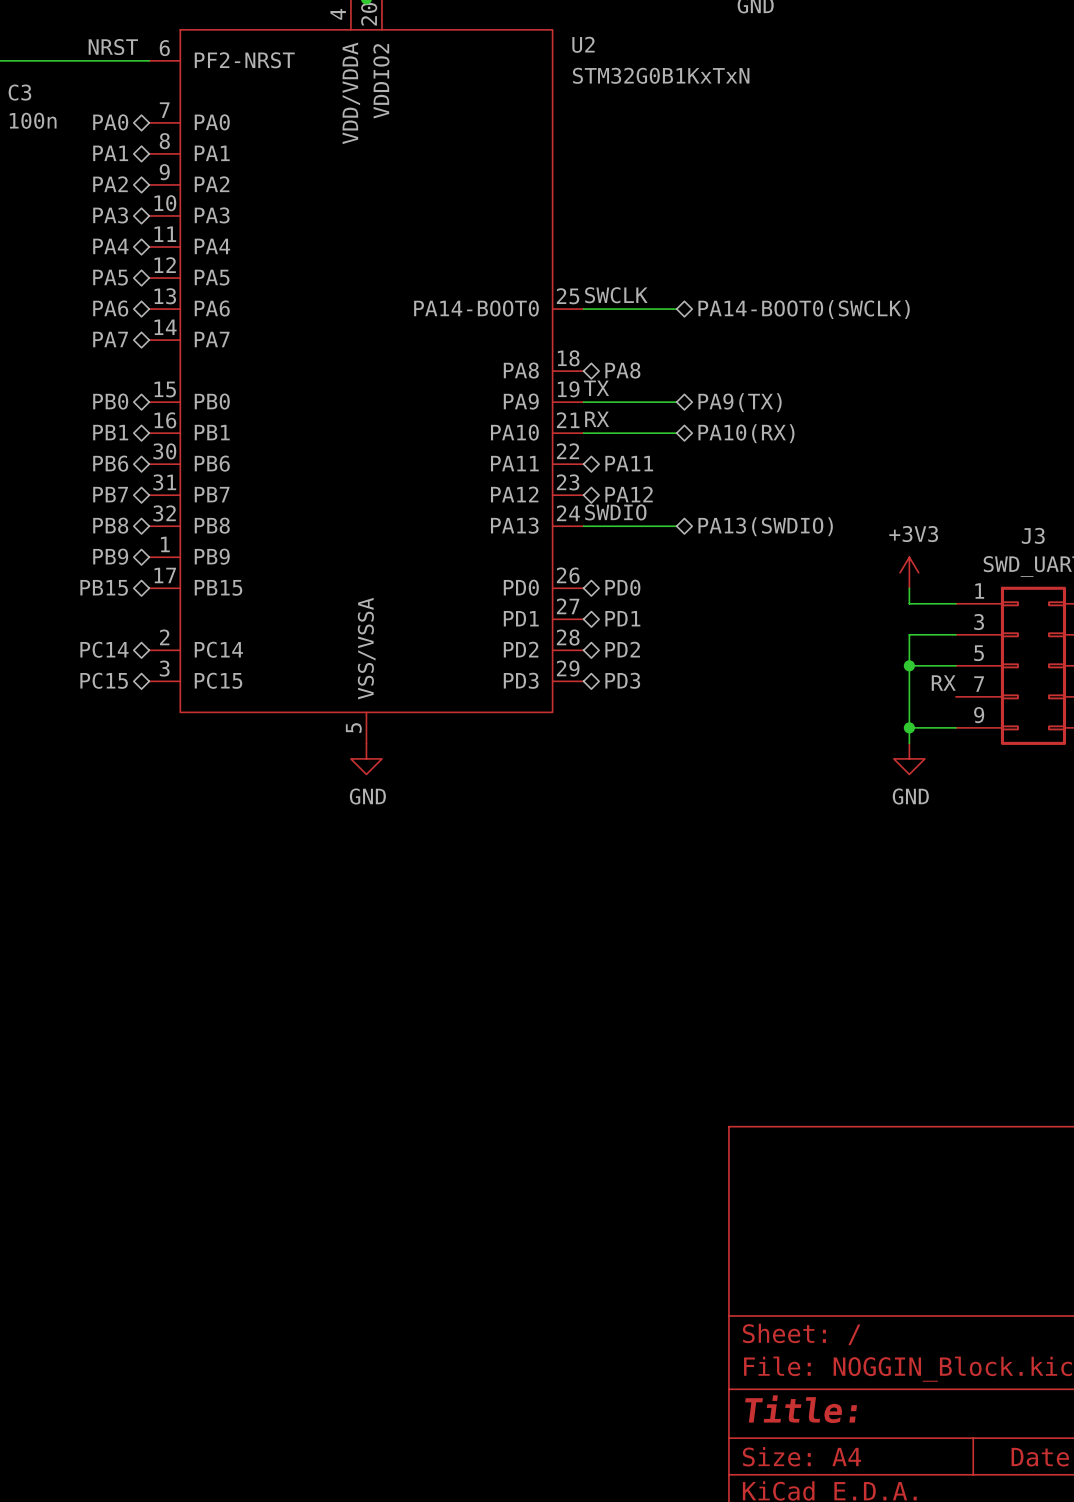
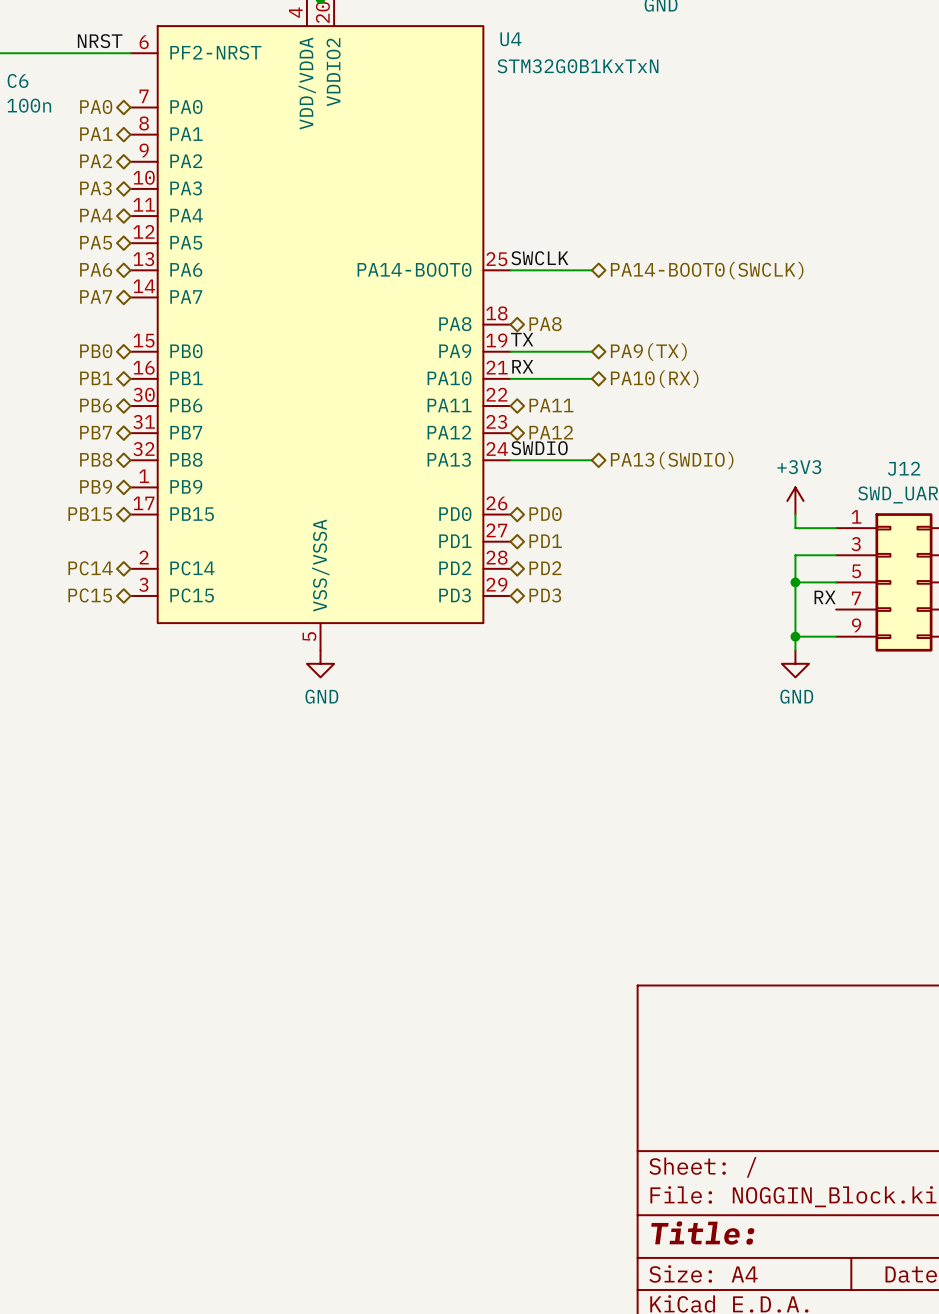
U2 name: U2 (583, 44) -> U4 (510, 39)
C3 name: C3 (19, 92) -> C6 (18, 80)
J3 name: J3 (1033, 535) -> J12 (904, 468)

